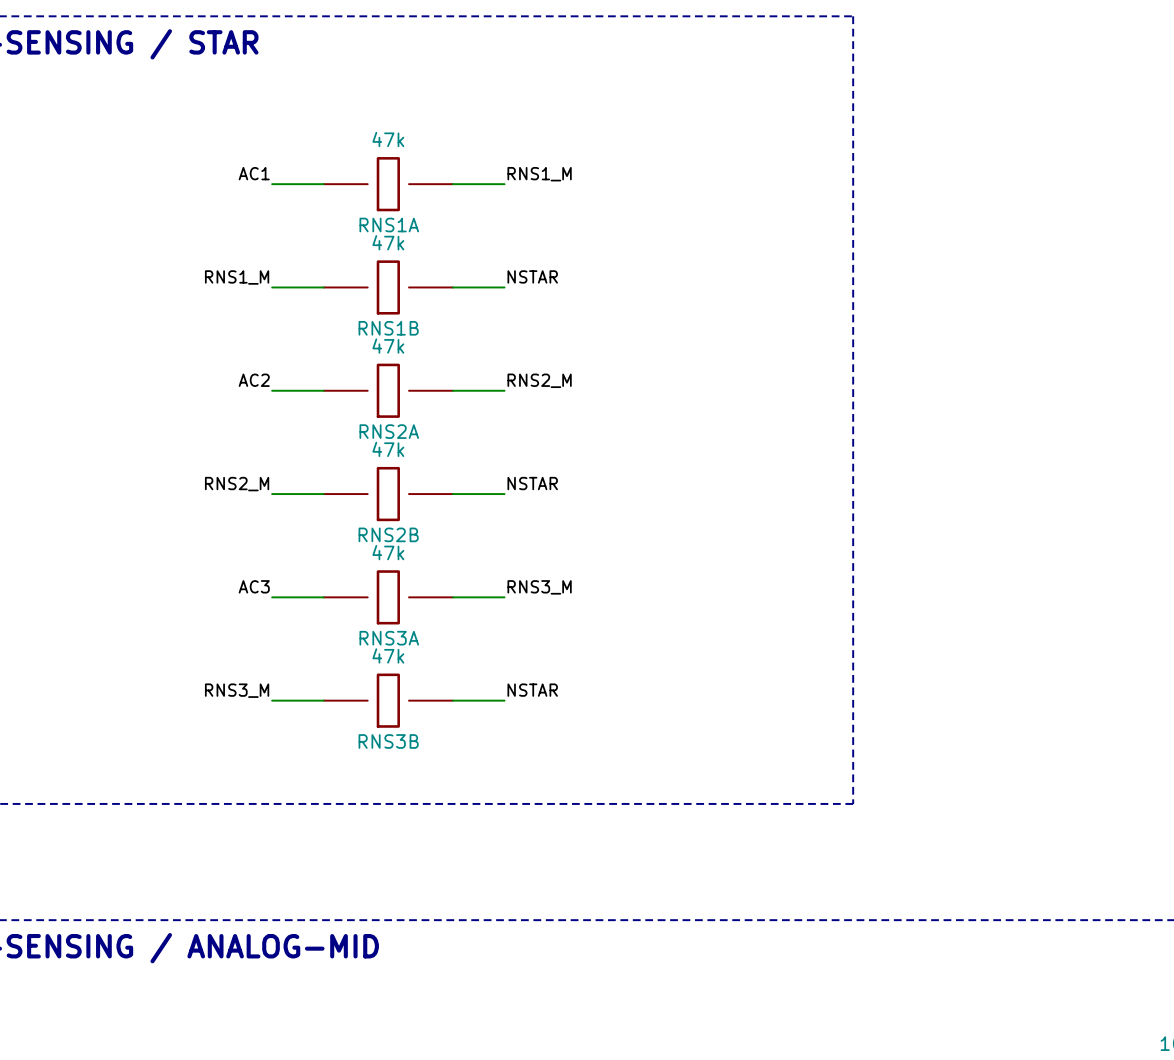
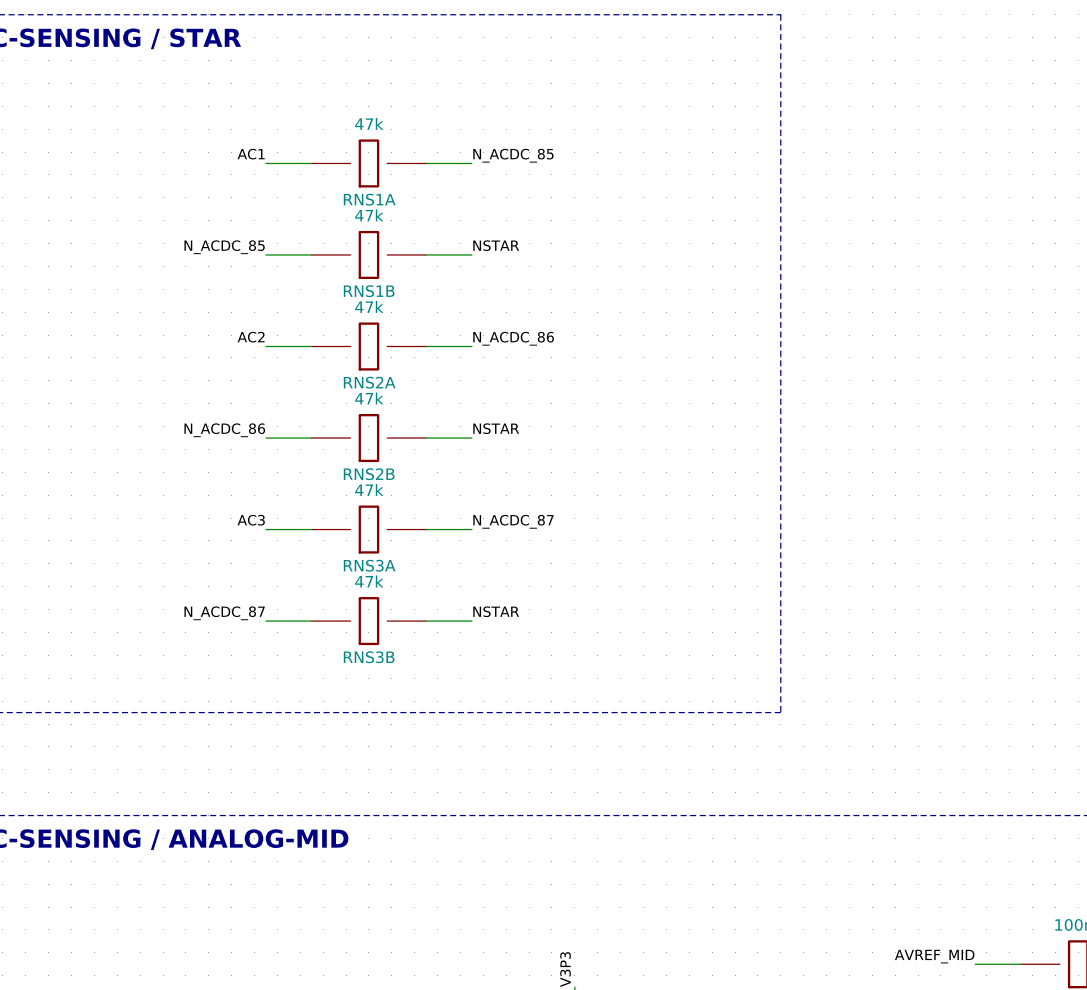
label: RNS1_M (539, 174) -> N_ACDC_85 (513, 155)
label: RNS1_M (237, 277) -> N_ACDC_85 (224, 247)
label: RNS2_M (539, 380) -> N_ACDC_86 (513, 338)
label: RNS2_M (237, 484) -> N_ACDC_86 (224, 430)
label: RNS3_M (539, 587) -> N_ACDC_87 (513, 521)
label: RNS3_M (237, 690) -> N_ACDC_87 (224, 613)

